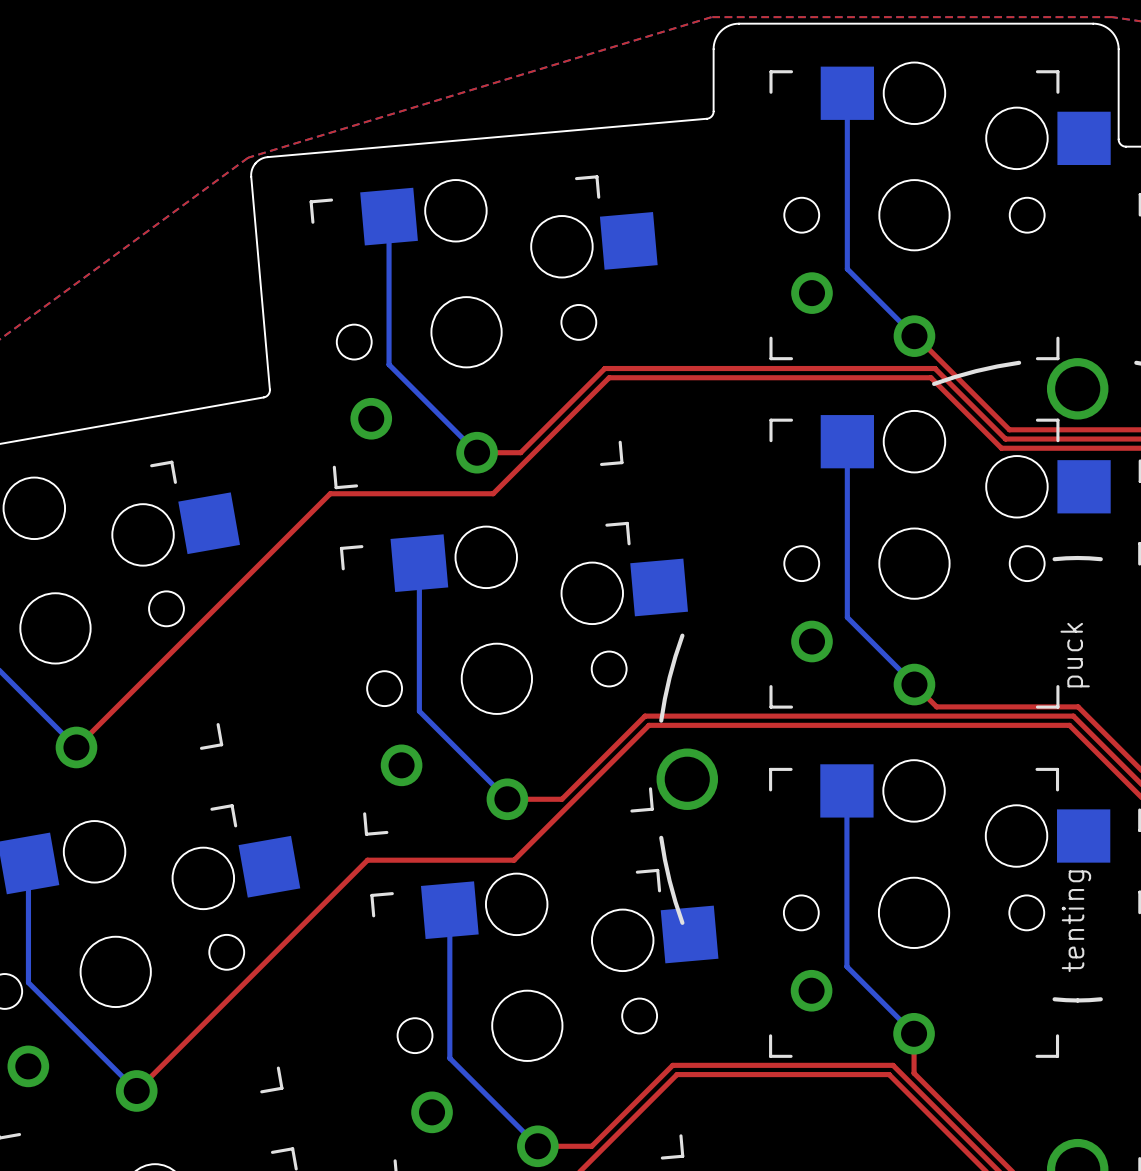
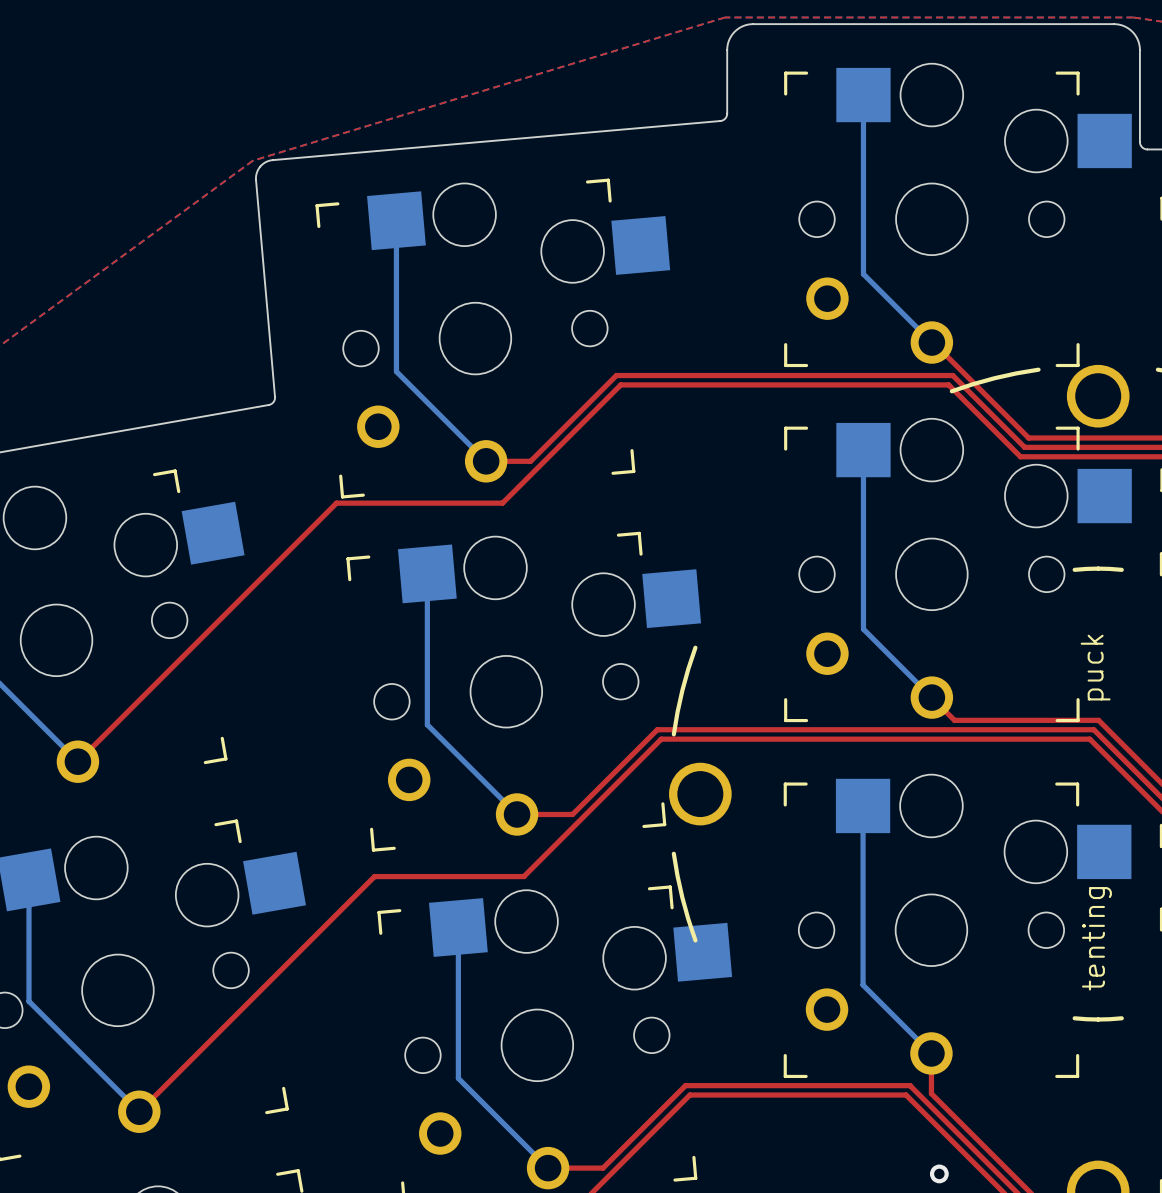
via: none -> (939, 1173)

